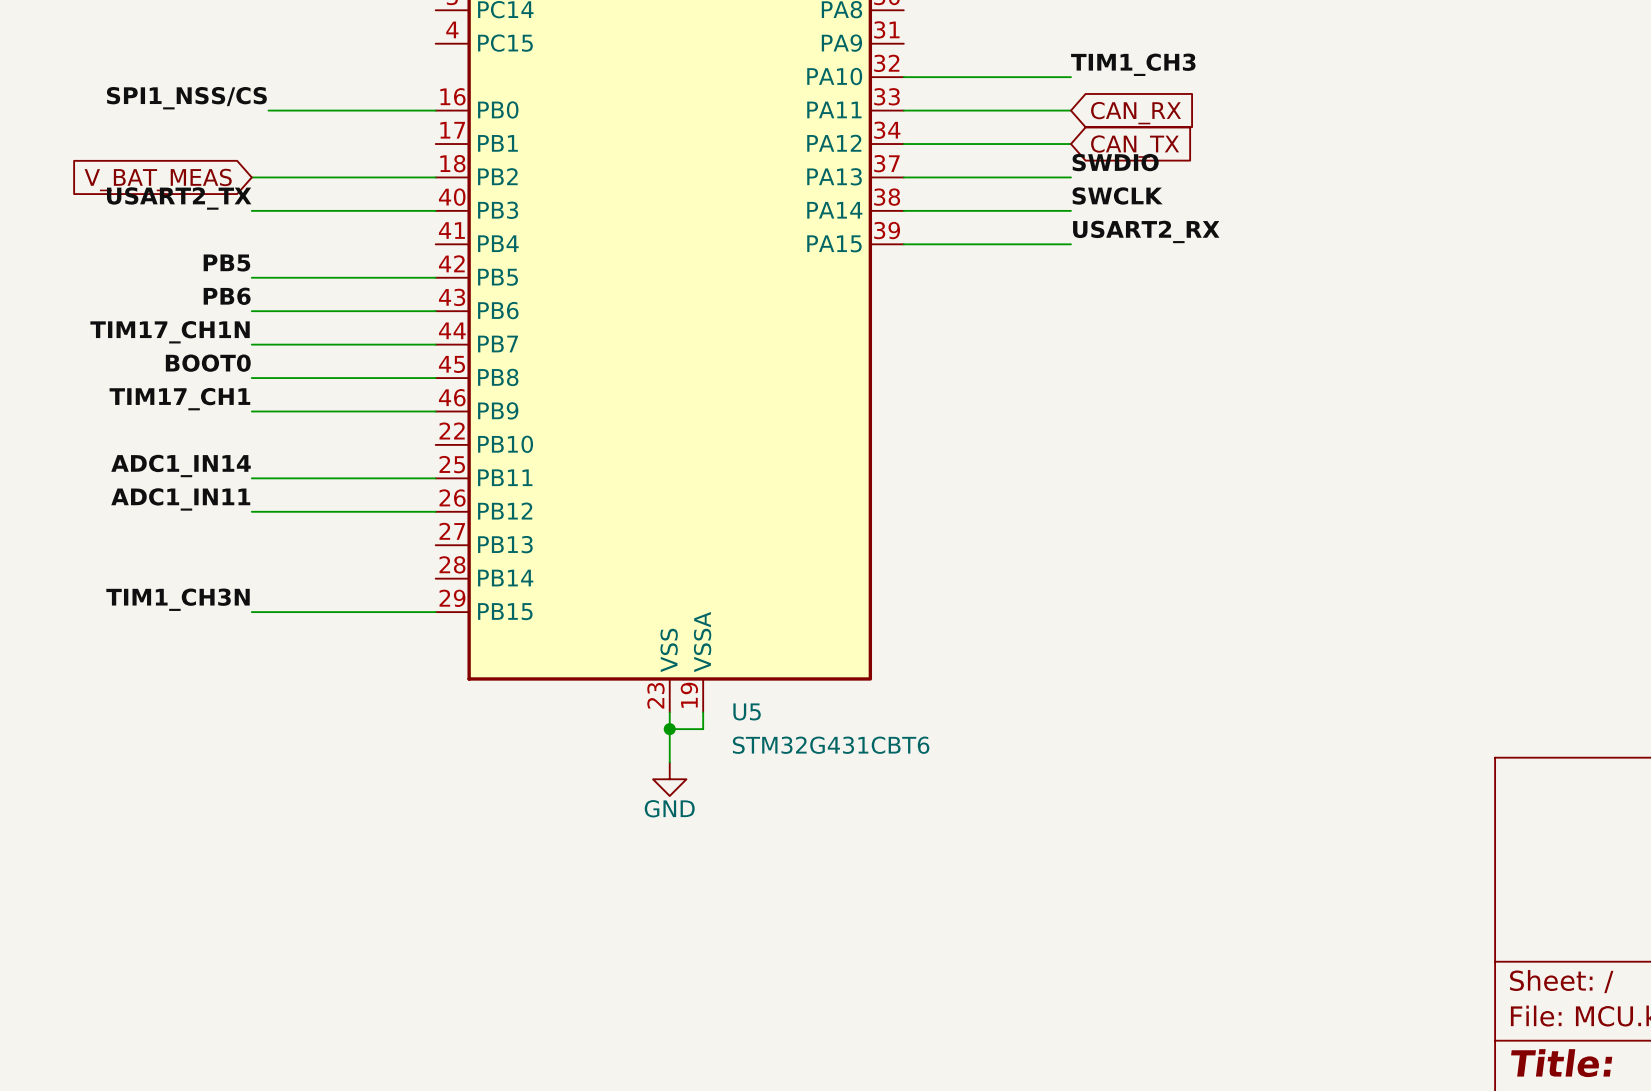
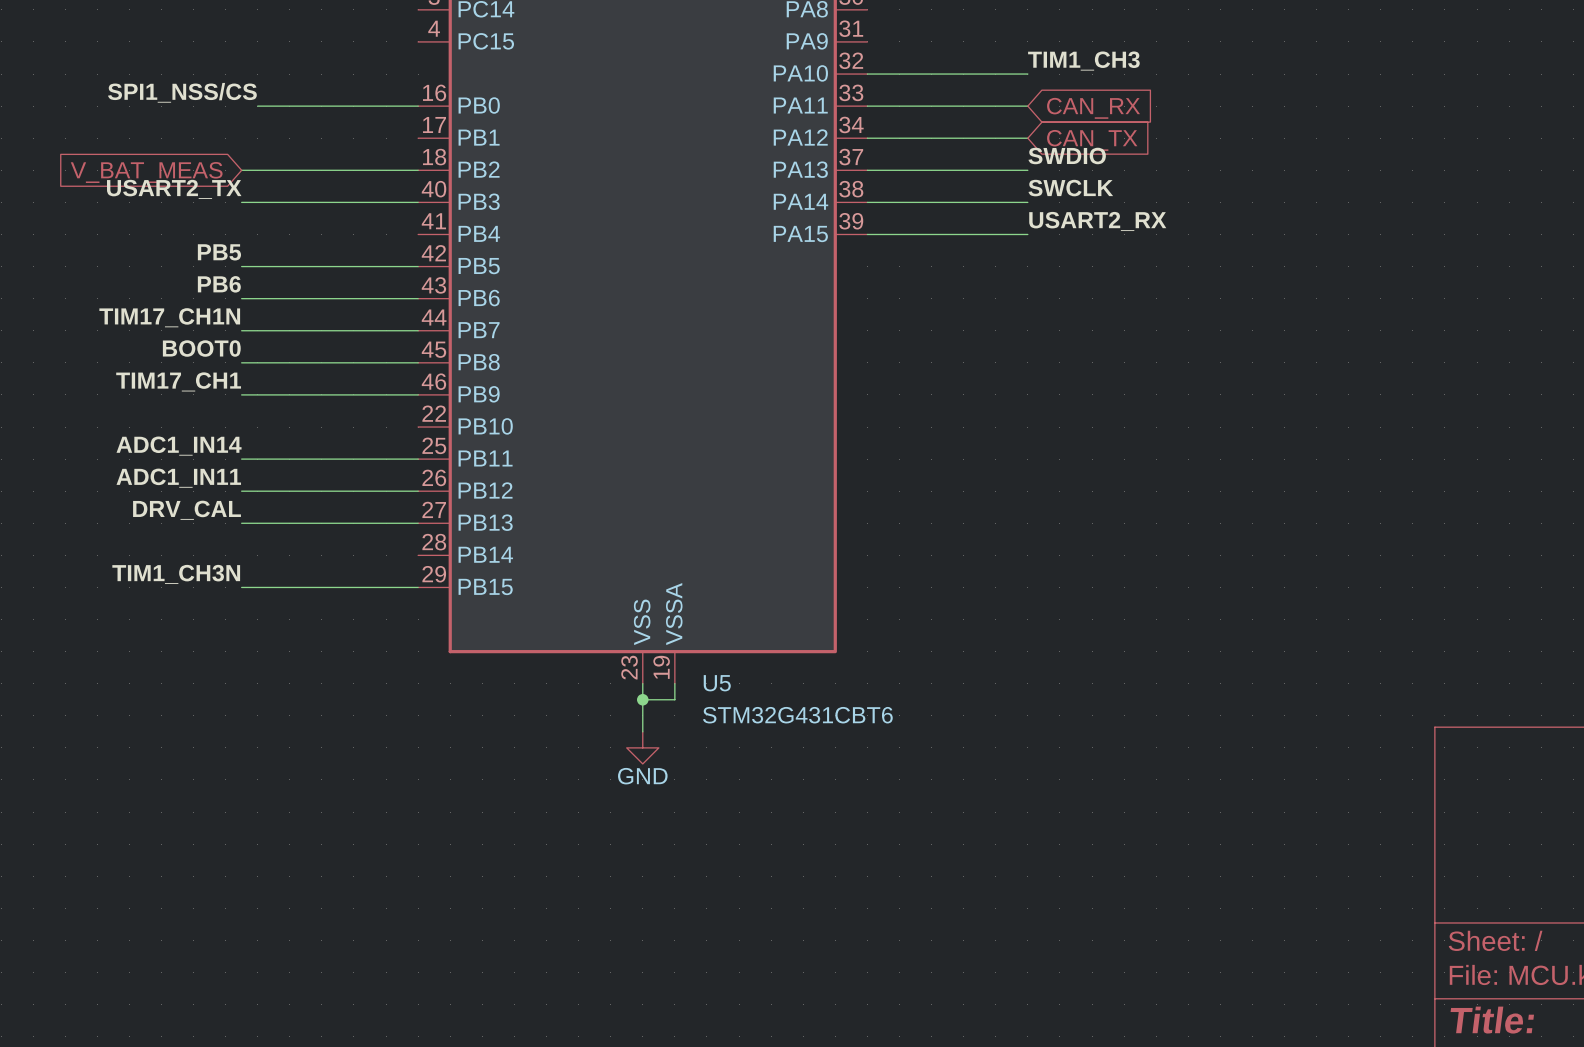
label: none -> DRV_CAL (187, 510)
wire: none -> (241, 523) (418, 523)

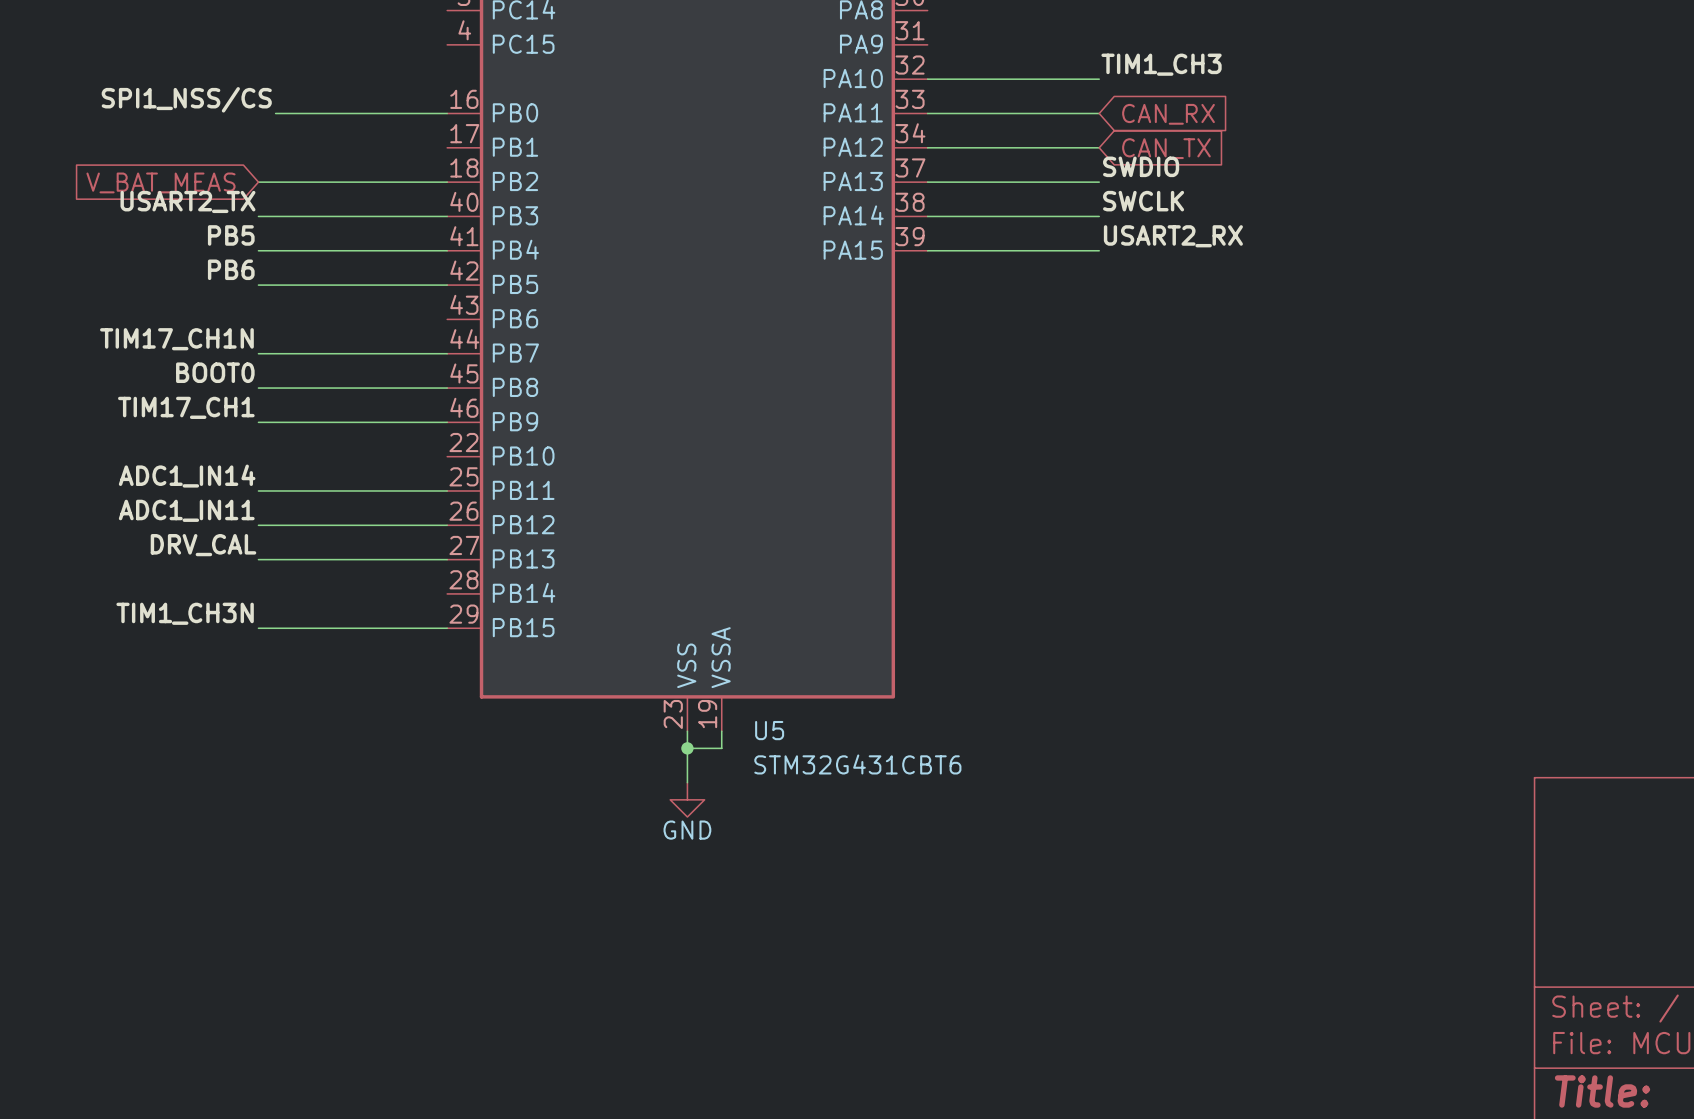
label: none -> PB5 (231, 235)
label: PB5 (219, 252) -> PB6 (231, 269)
label: PB6 (219, 284) -> none
wire: (241, 298) (418, 298) -> (258, 250) (447, 250)

